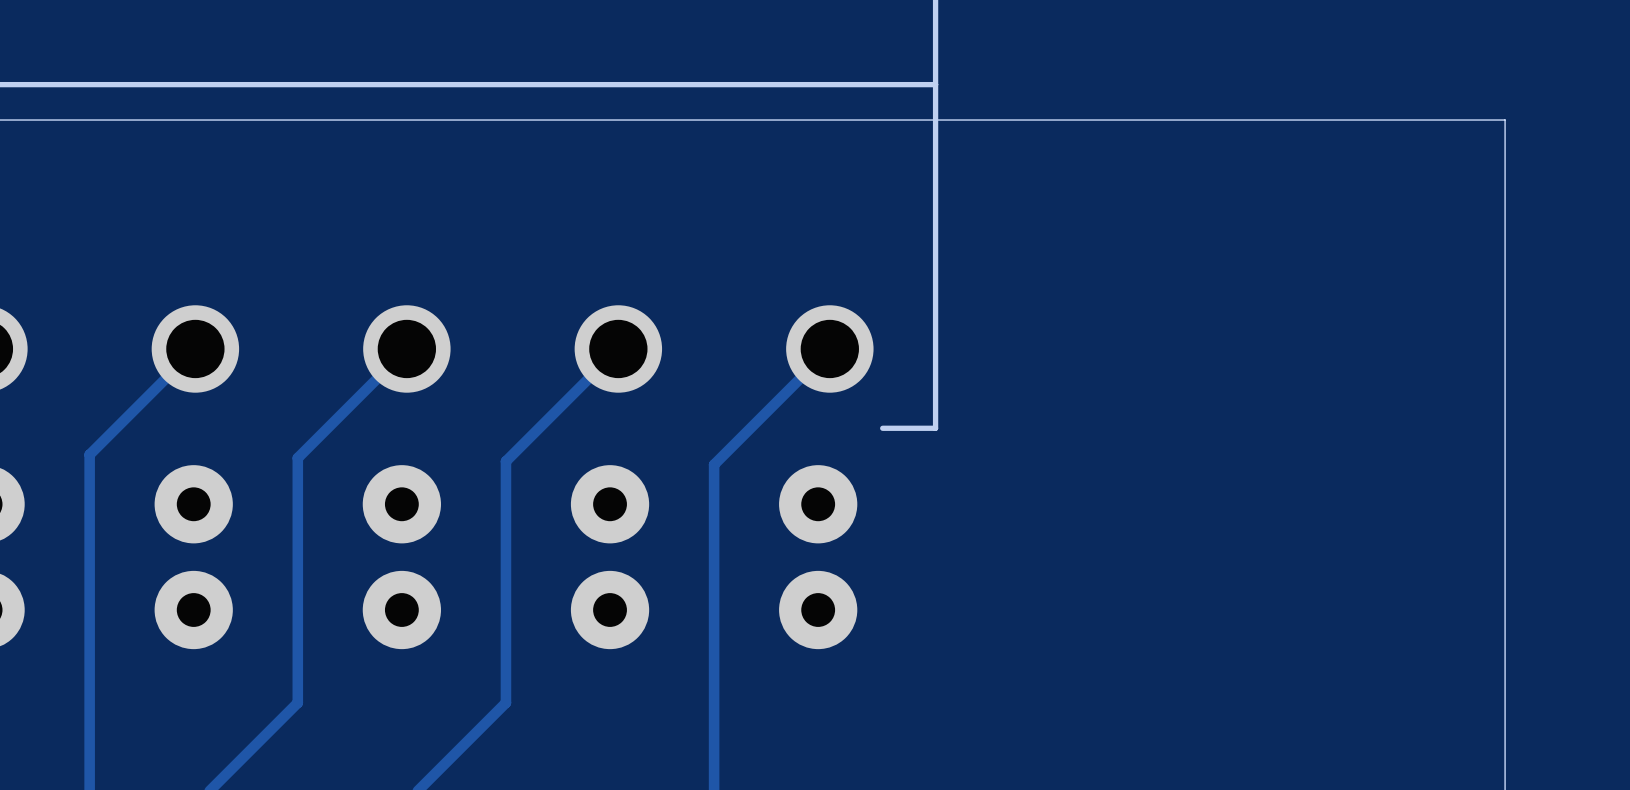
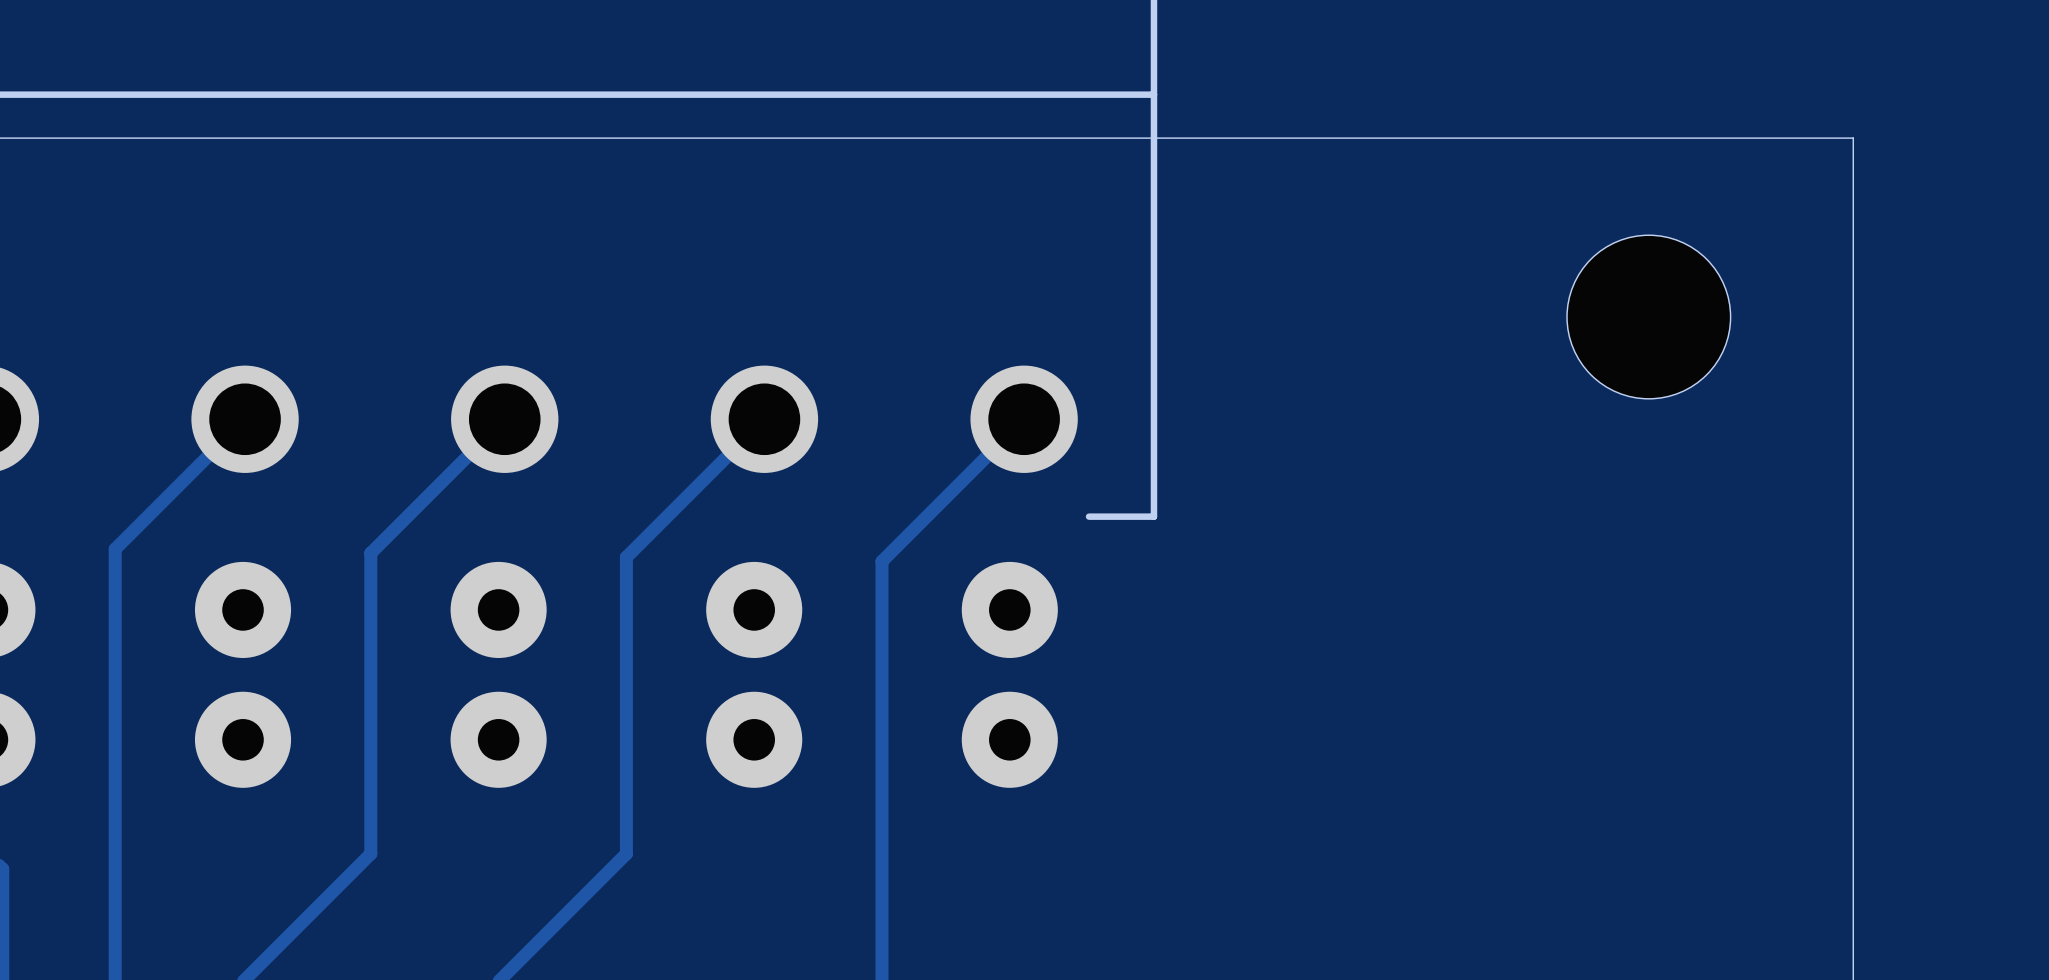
hole: none -> (1648, 317)

